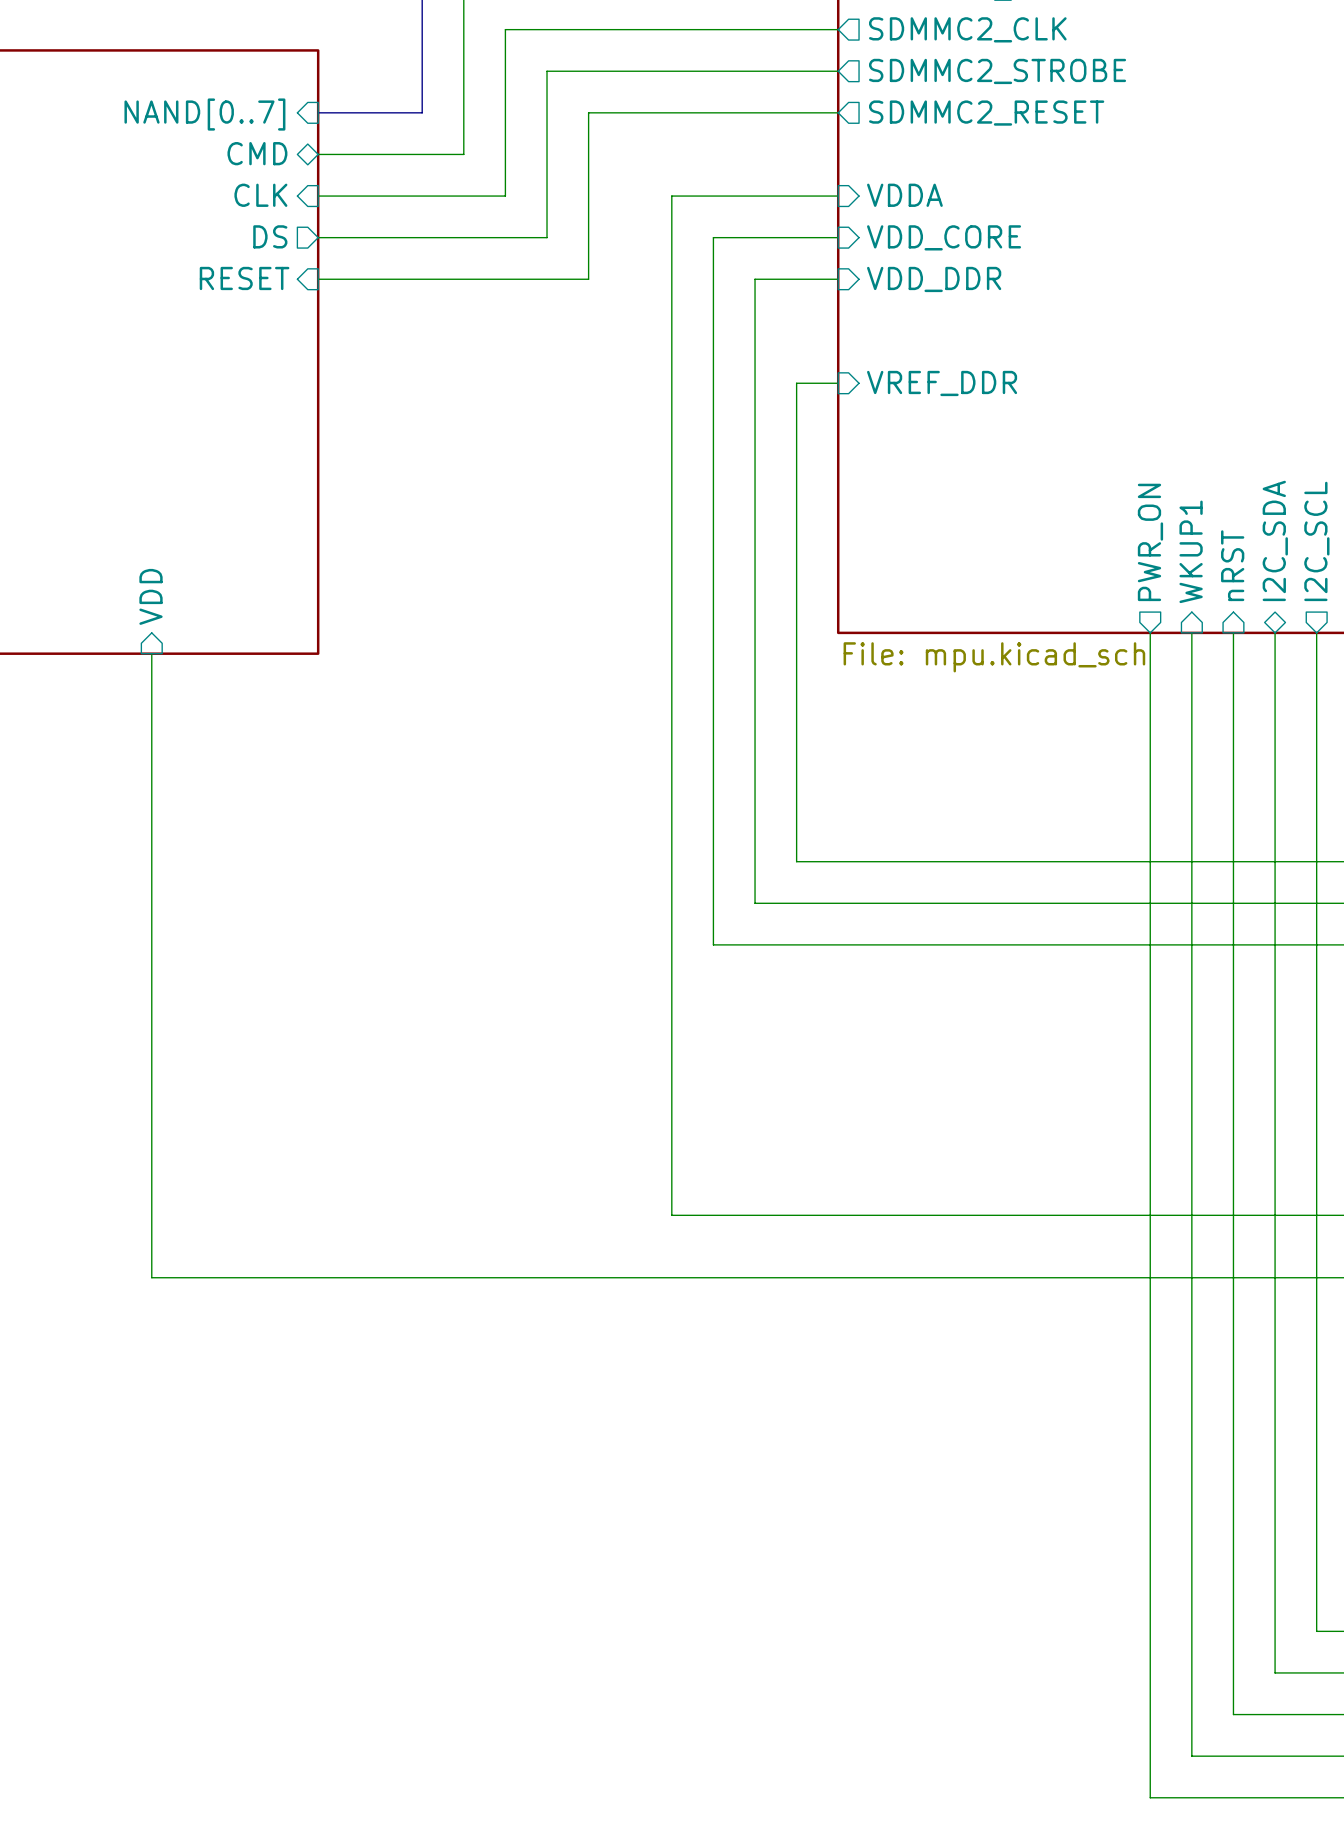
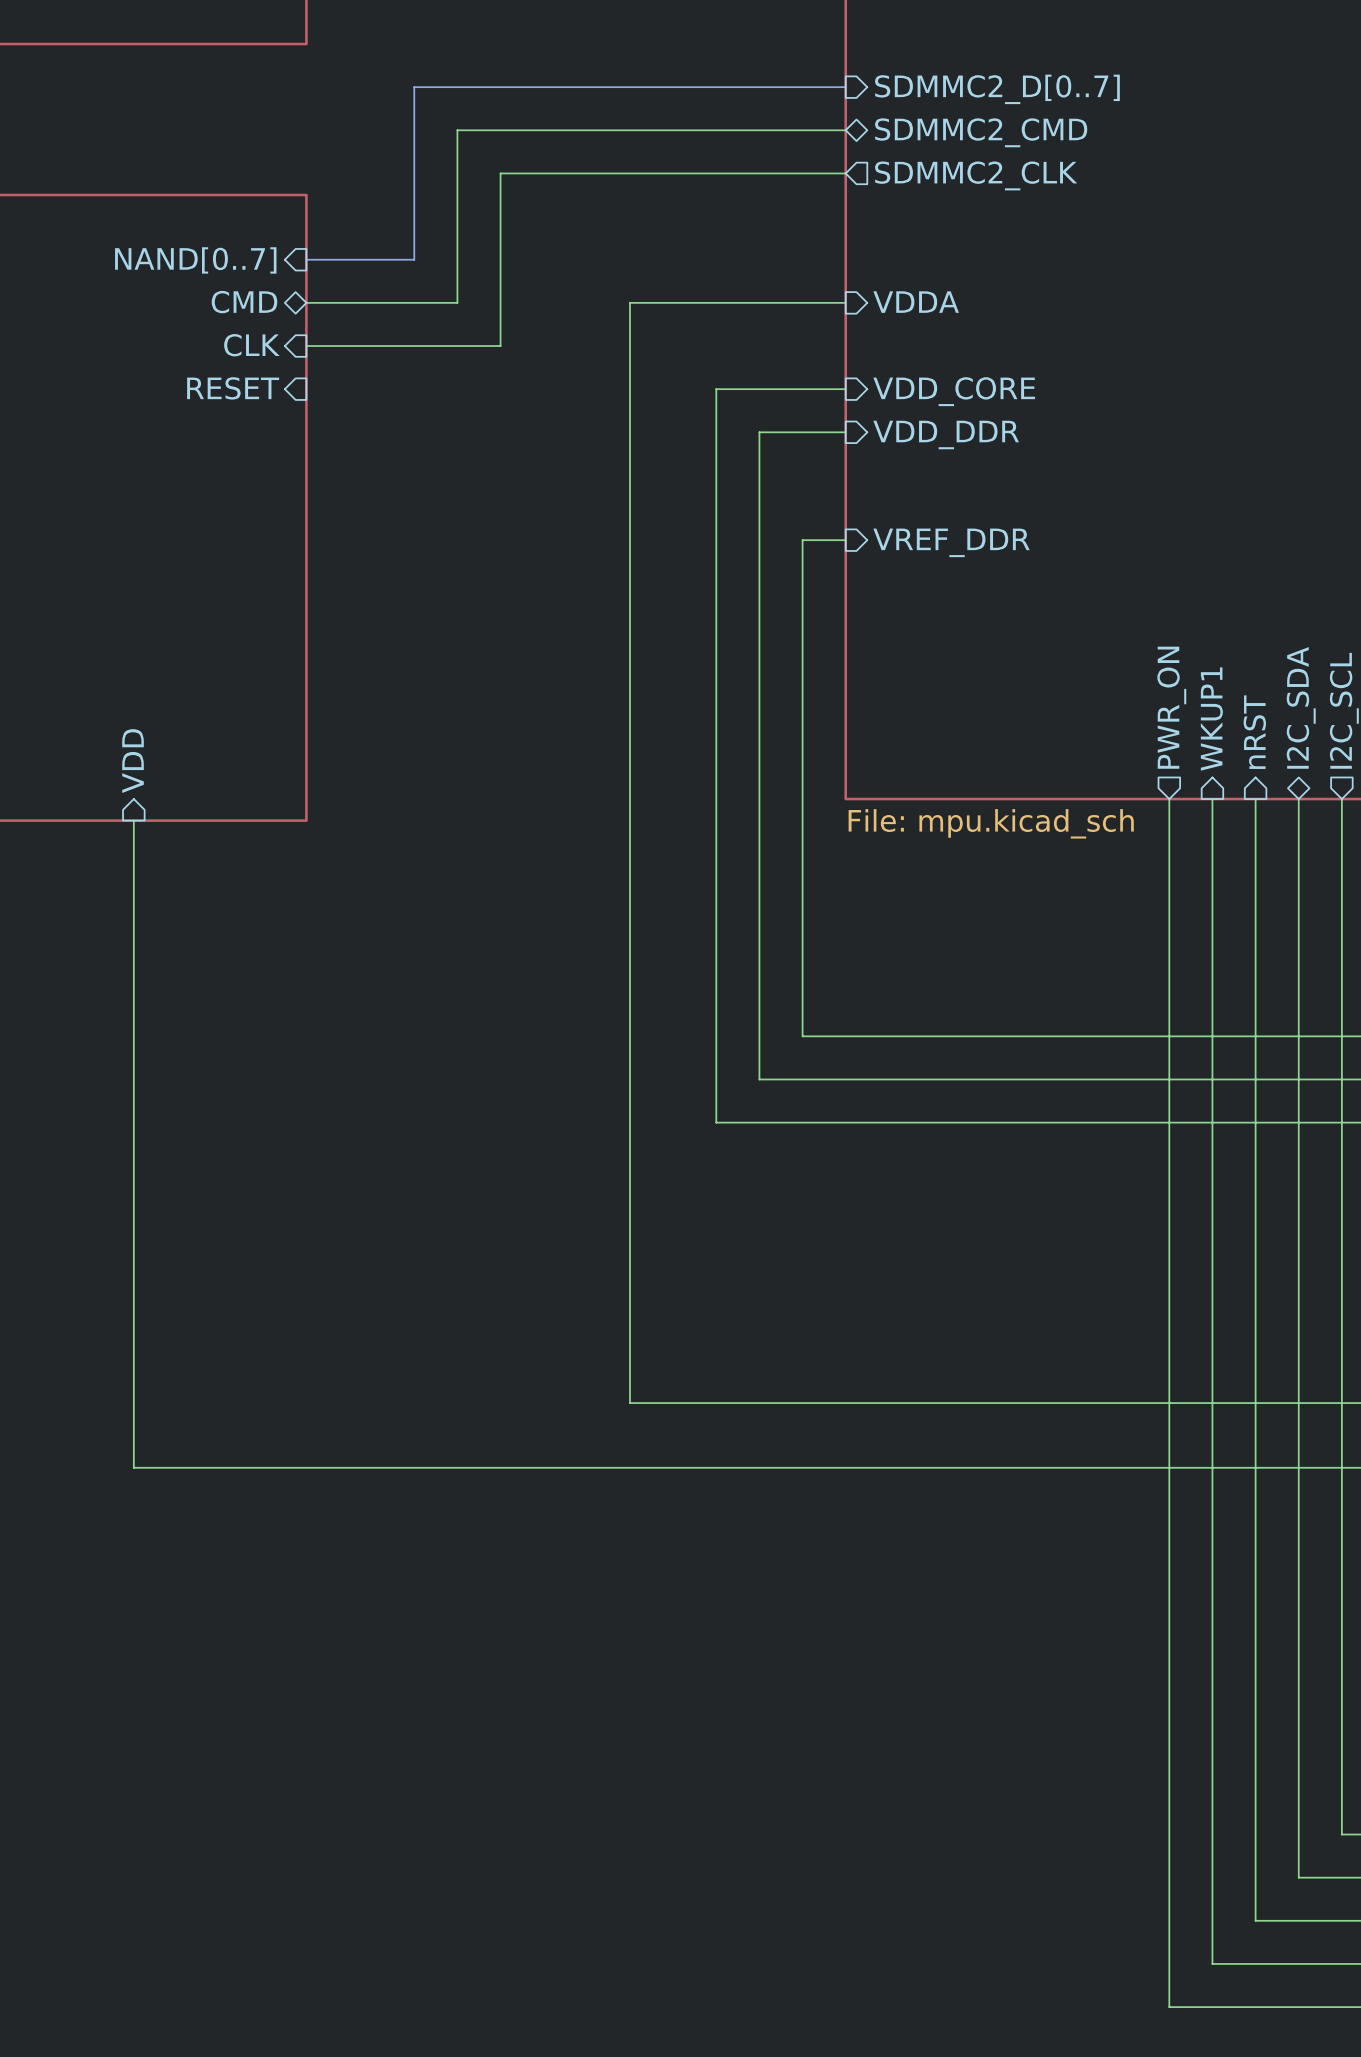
wire: (838, 71) (547, 71) (547, 237) (318, 237) -> none
sheet pin: SDMMC2_STROBE (997, 71) -> none
wire: (838, 112) (588, 112) (588, 279) (318, 279) -> none
sheet pin: SDMMC2_RESET (986, 113) -> none
sheet pin position: VDDA (904, 195) -> VDDA (916, 302)
wire: (838, 196) (671, 196) (671, 1215) -> (845, 302) (630, 302) (630, 1403) (673, 1403)
sheet pin shape: output (270, 236) -> input (233, 388)
sheet pin: DS (270, 236) -> RESET (233, 388)
sheet pin: RESET (244, 278) -> none

